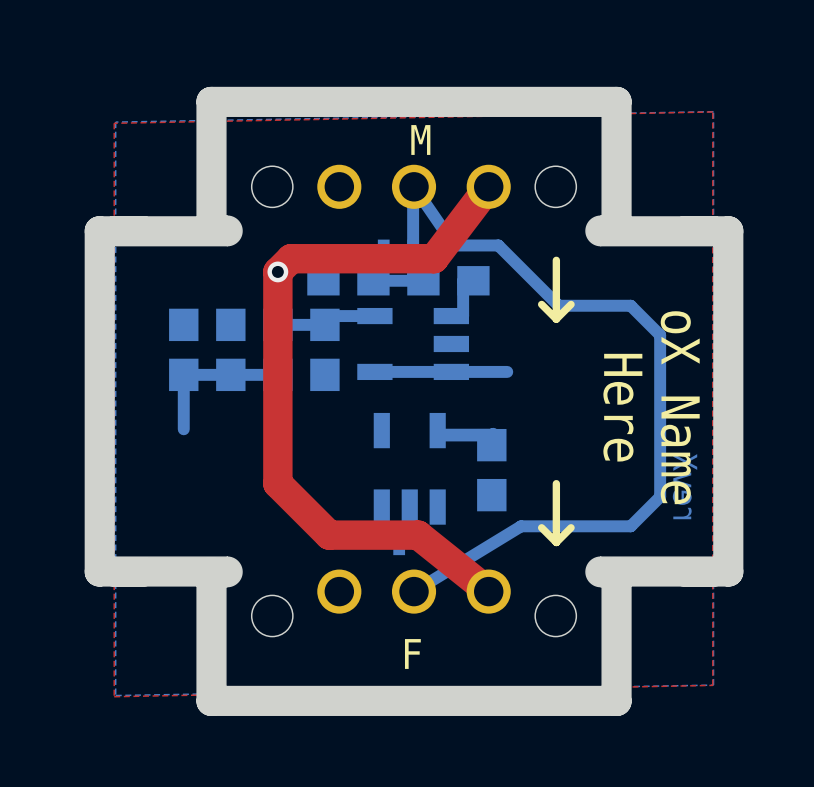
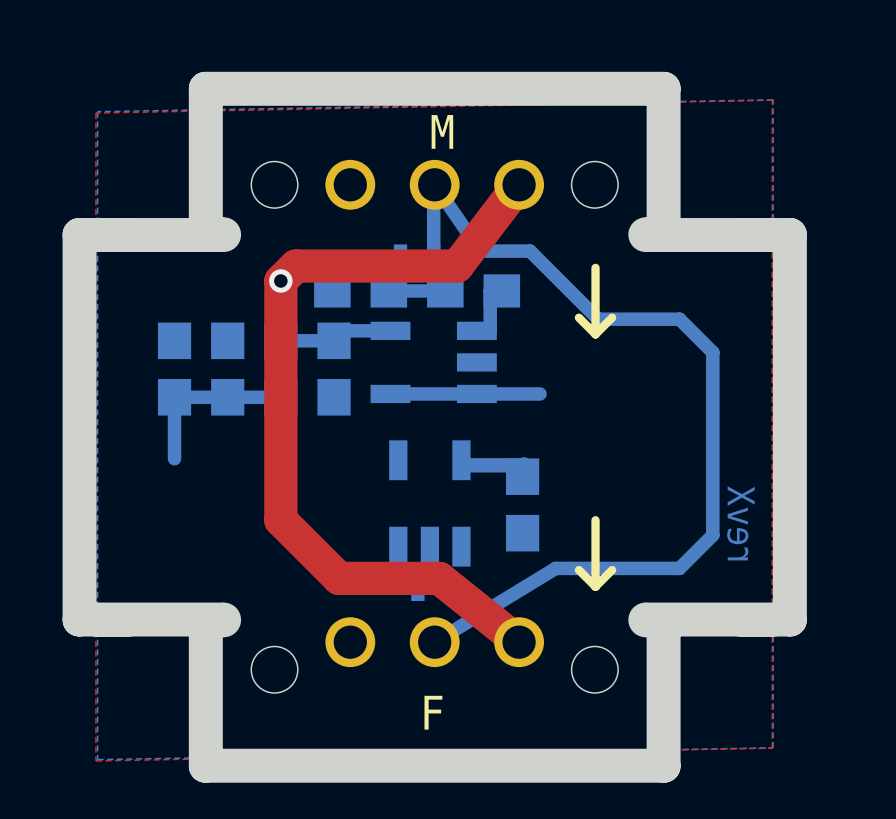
text: Here (622, 407) -> none
text: oX Name (680, 407) -> none

